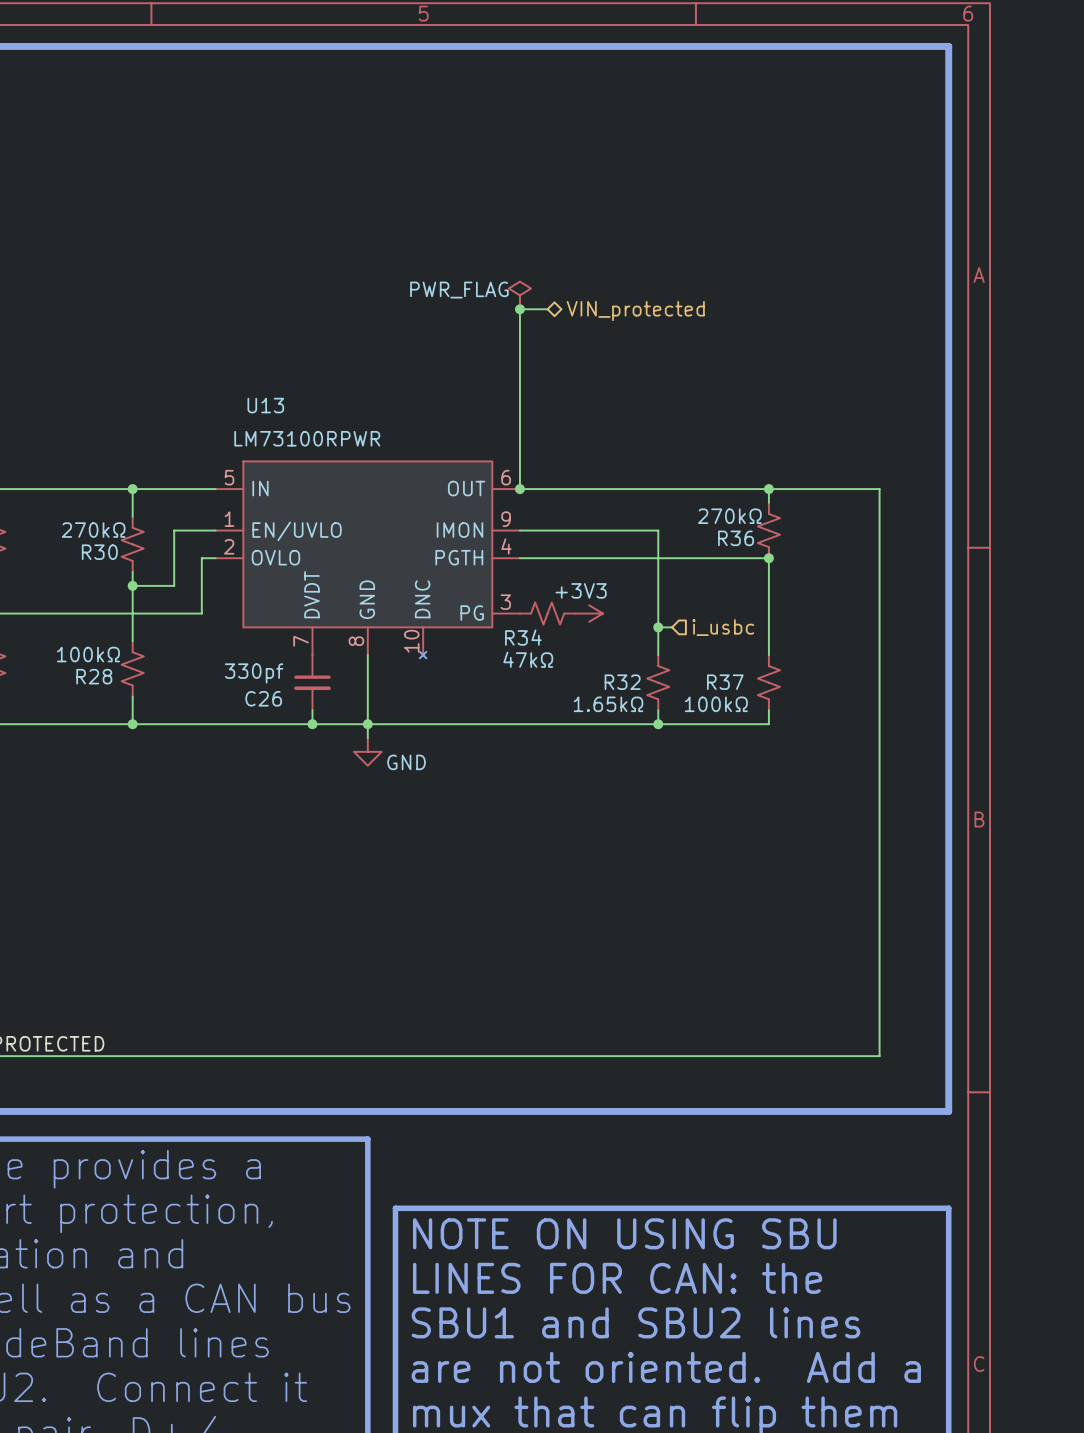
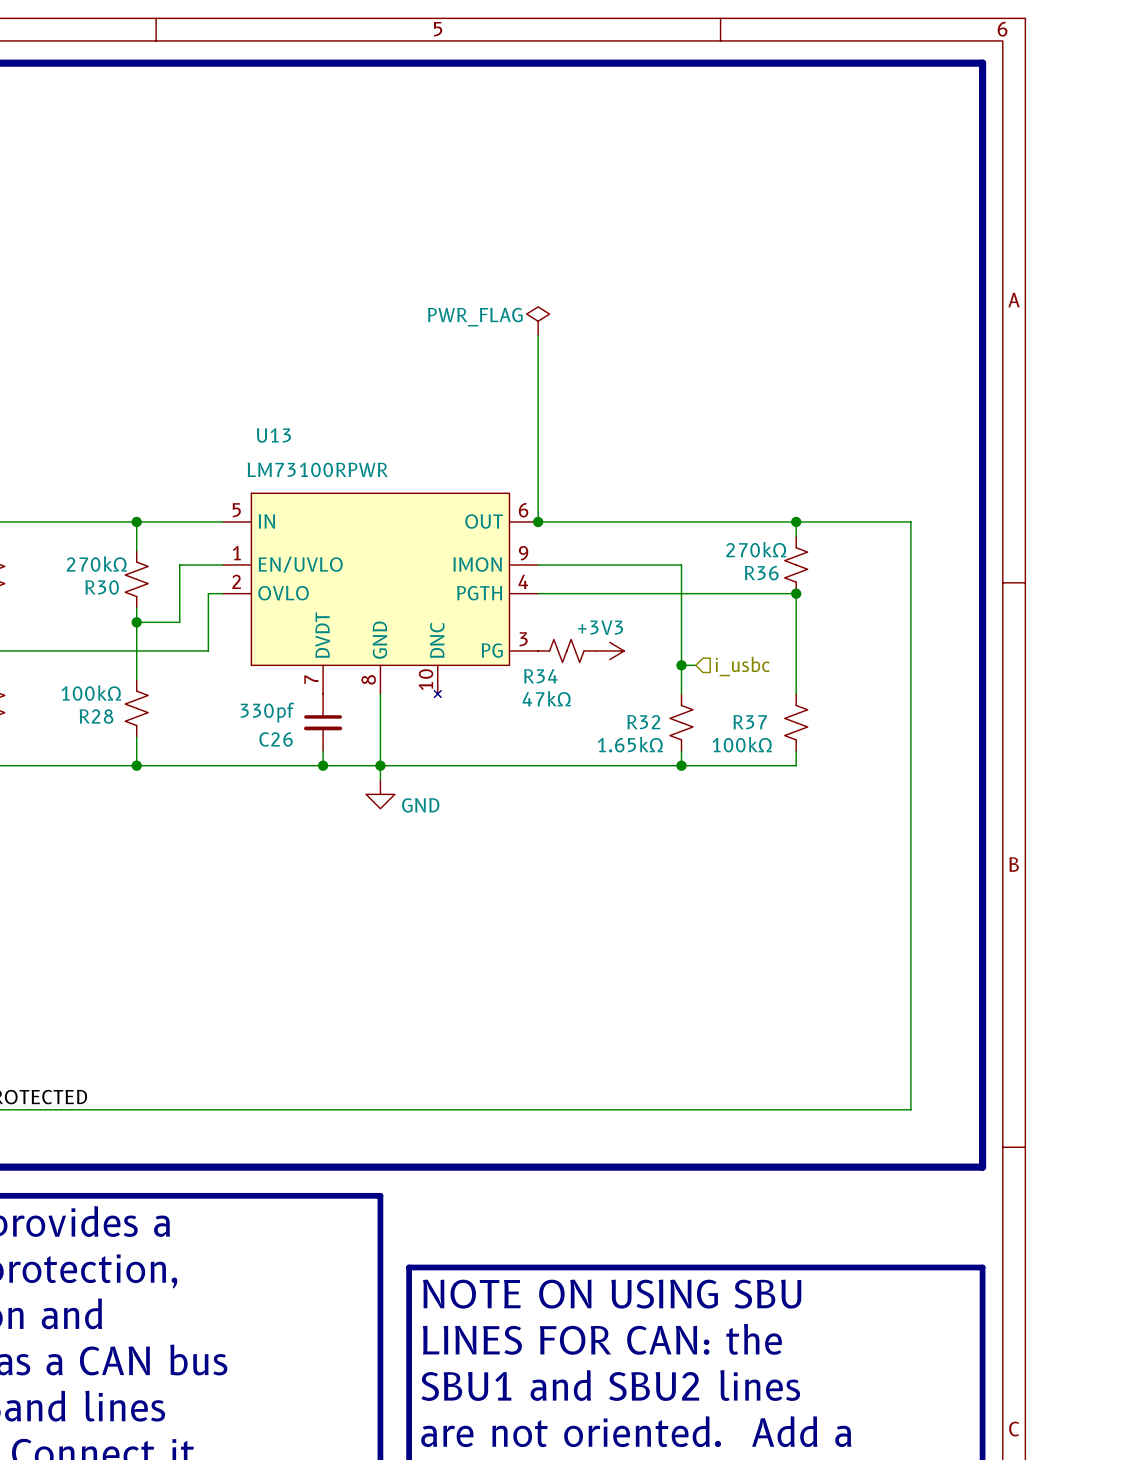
wire: (519, 309) (547, 309) -> none
junction: (519, 309) -> none
hierarchical label: VIN_protected (635, 311) -> none

